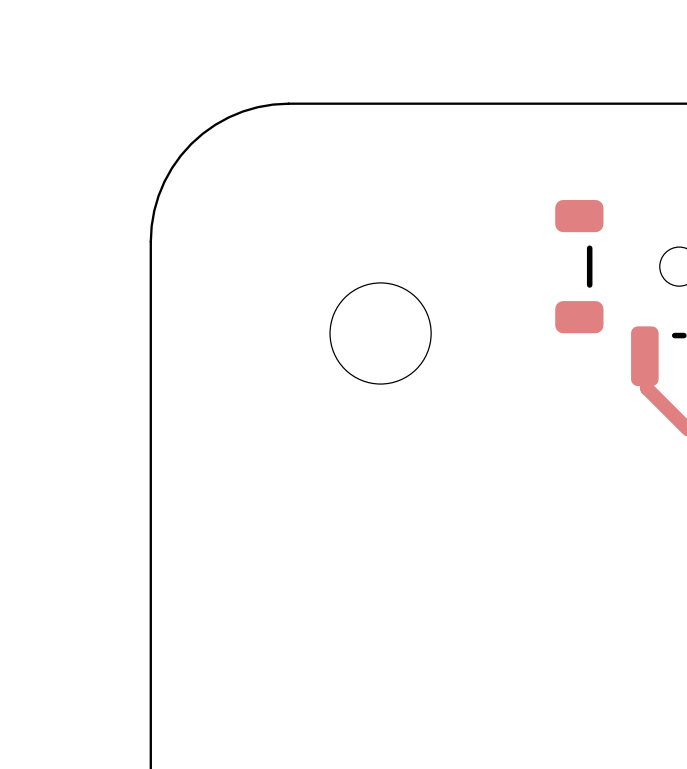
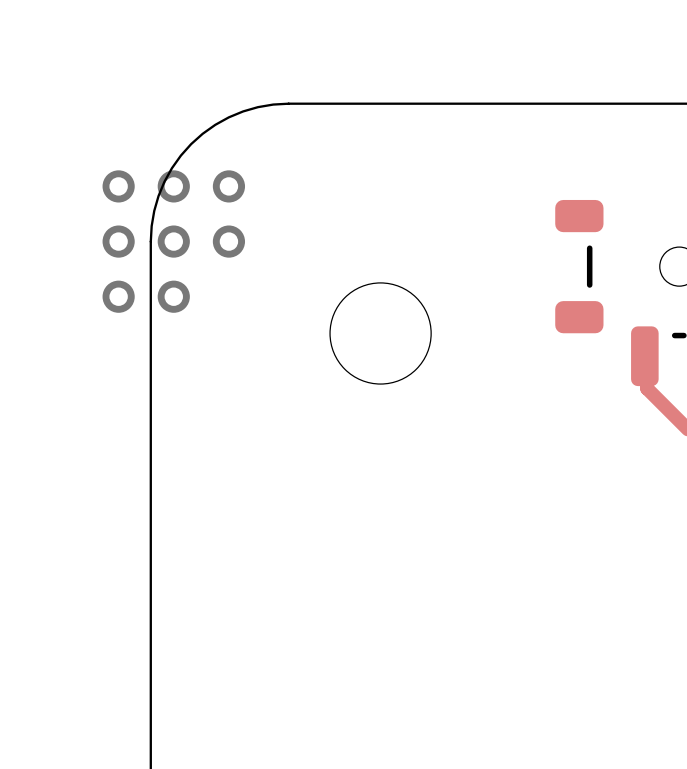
via: none -> (118, 186)
via: none -> (173, 186)
via: none -> (228, 186)
via: none -> (118, 241)
via: none -> (173, 241)
via: none -> (228, 241)
via: none -> (118, 296)
via: none -> (173, 296)

